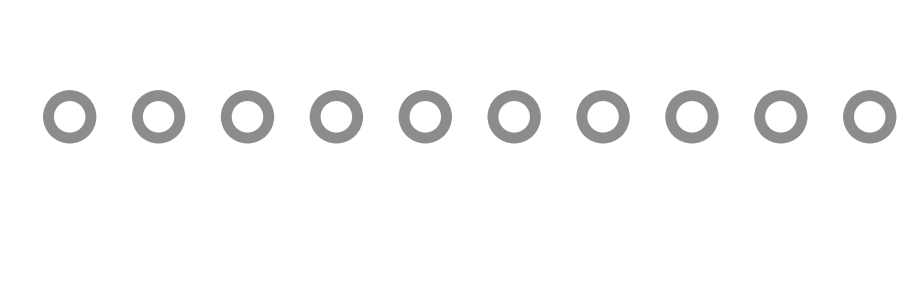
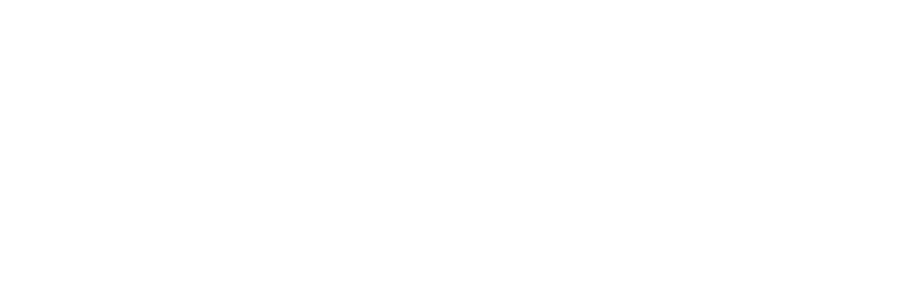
part: (469, 116) -> none

